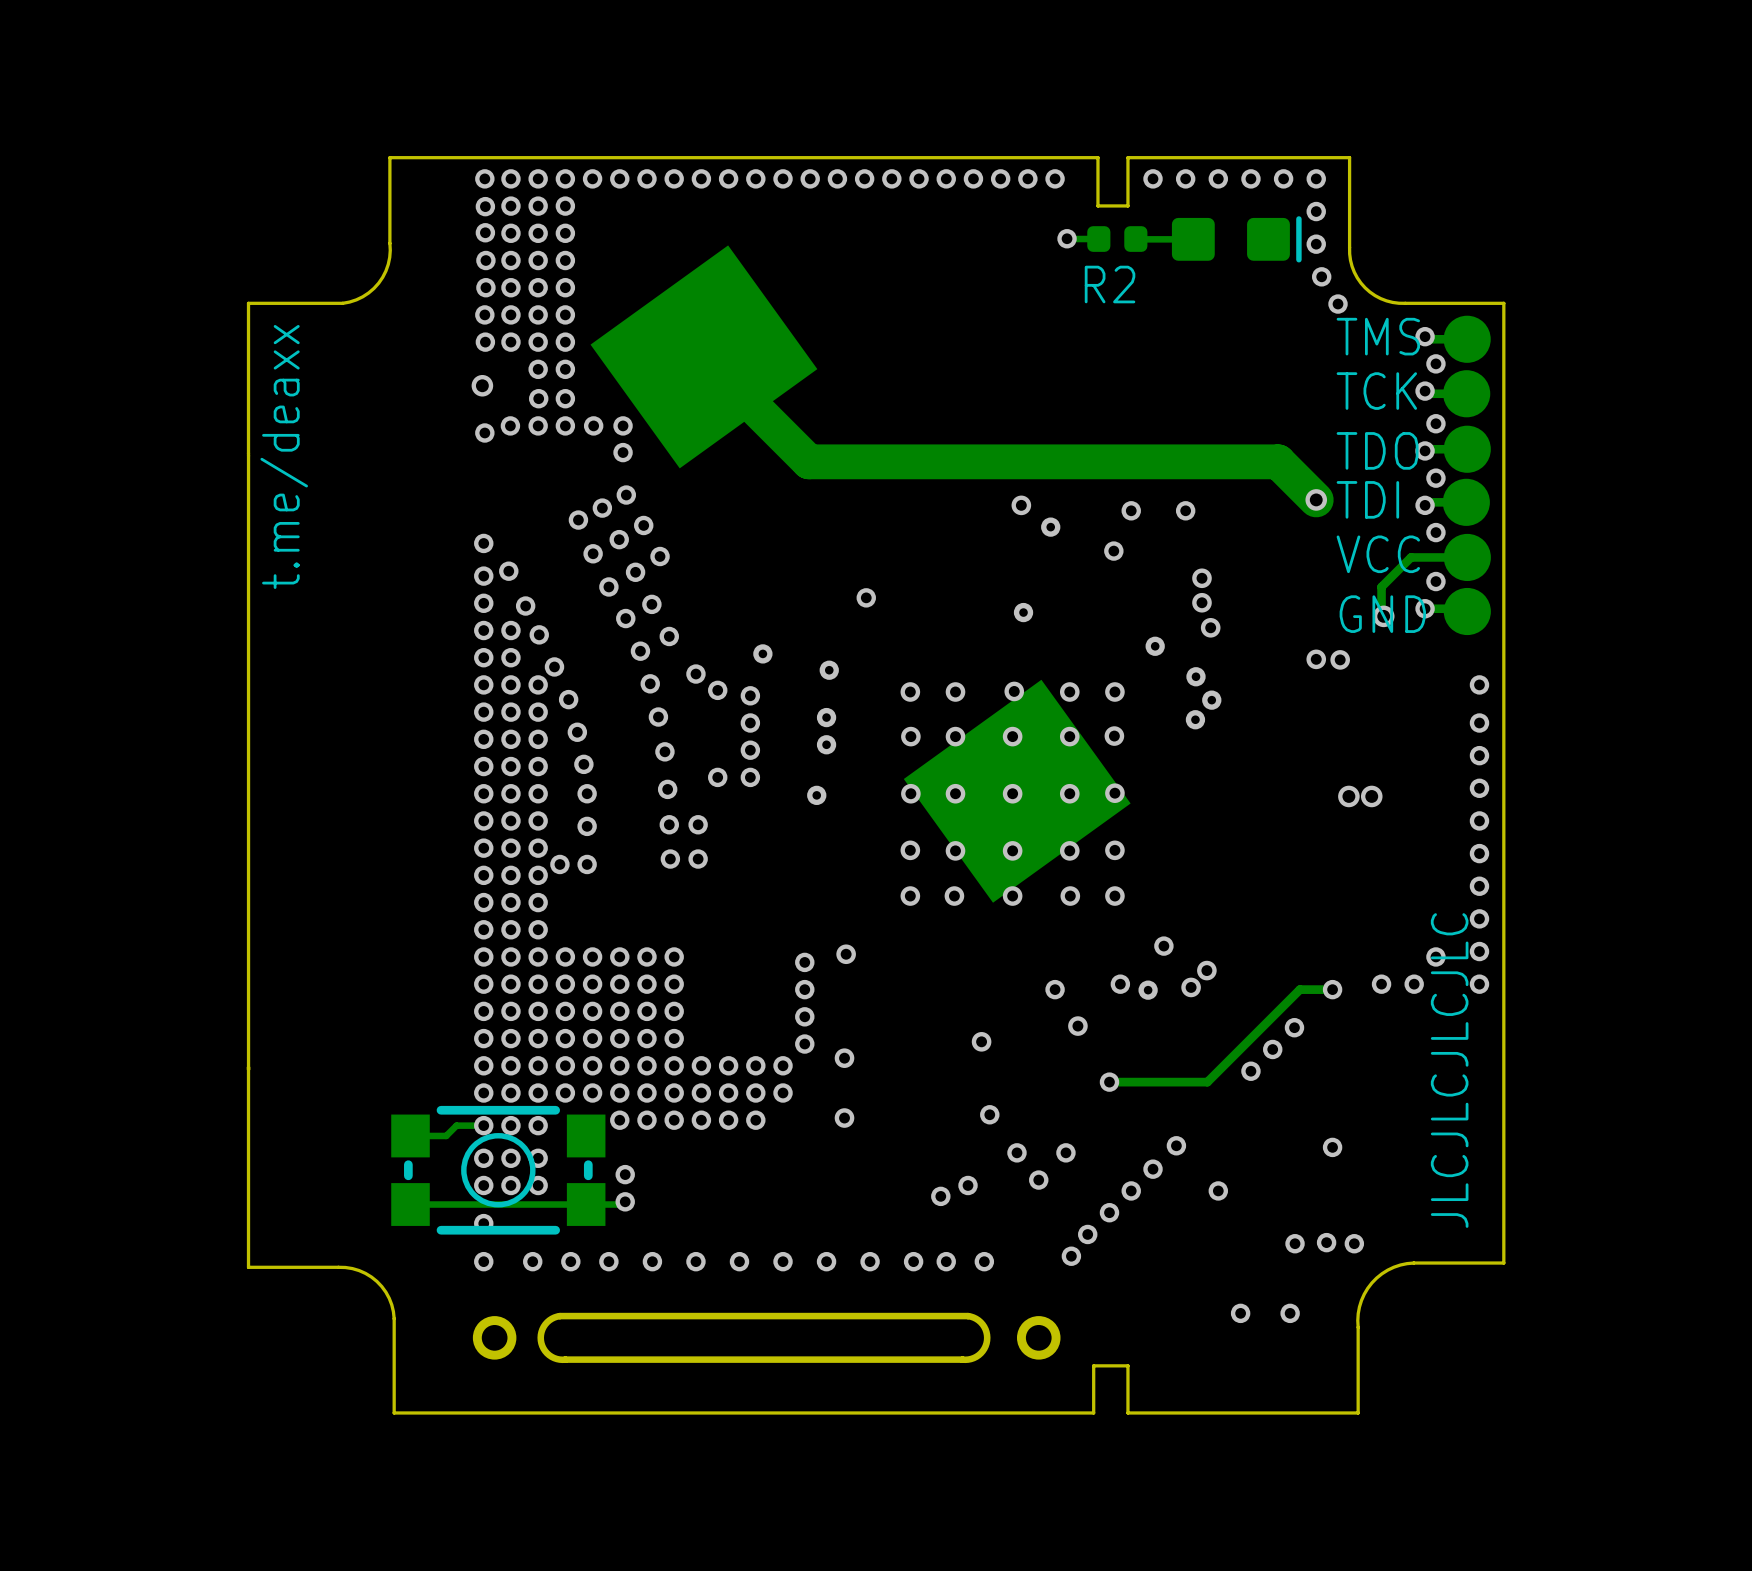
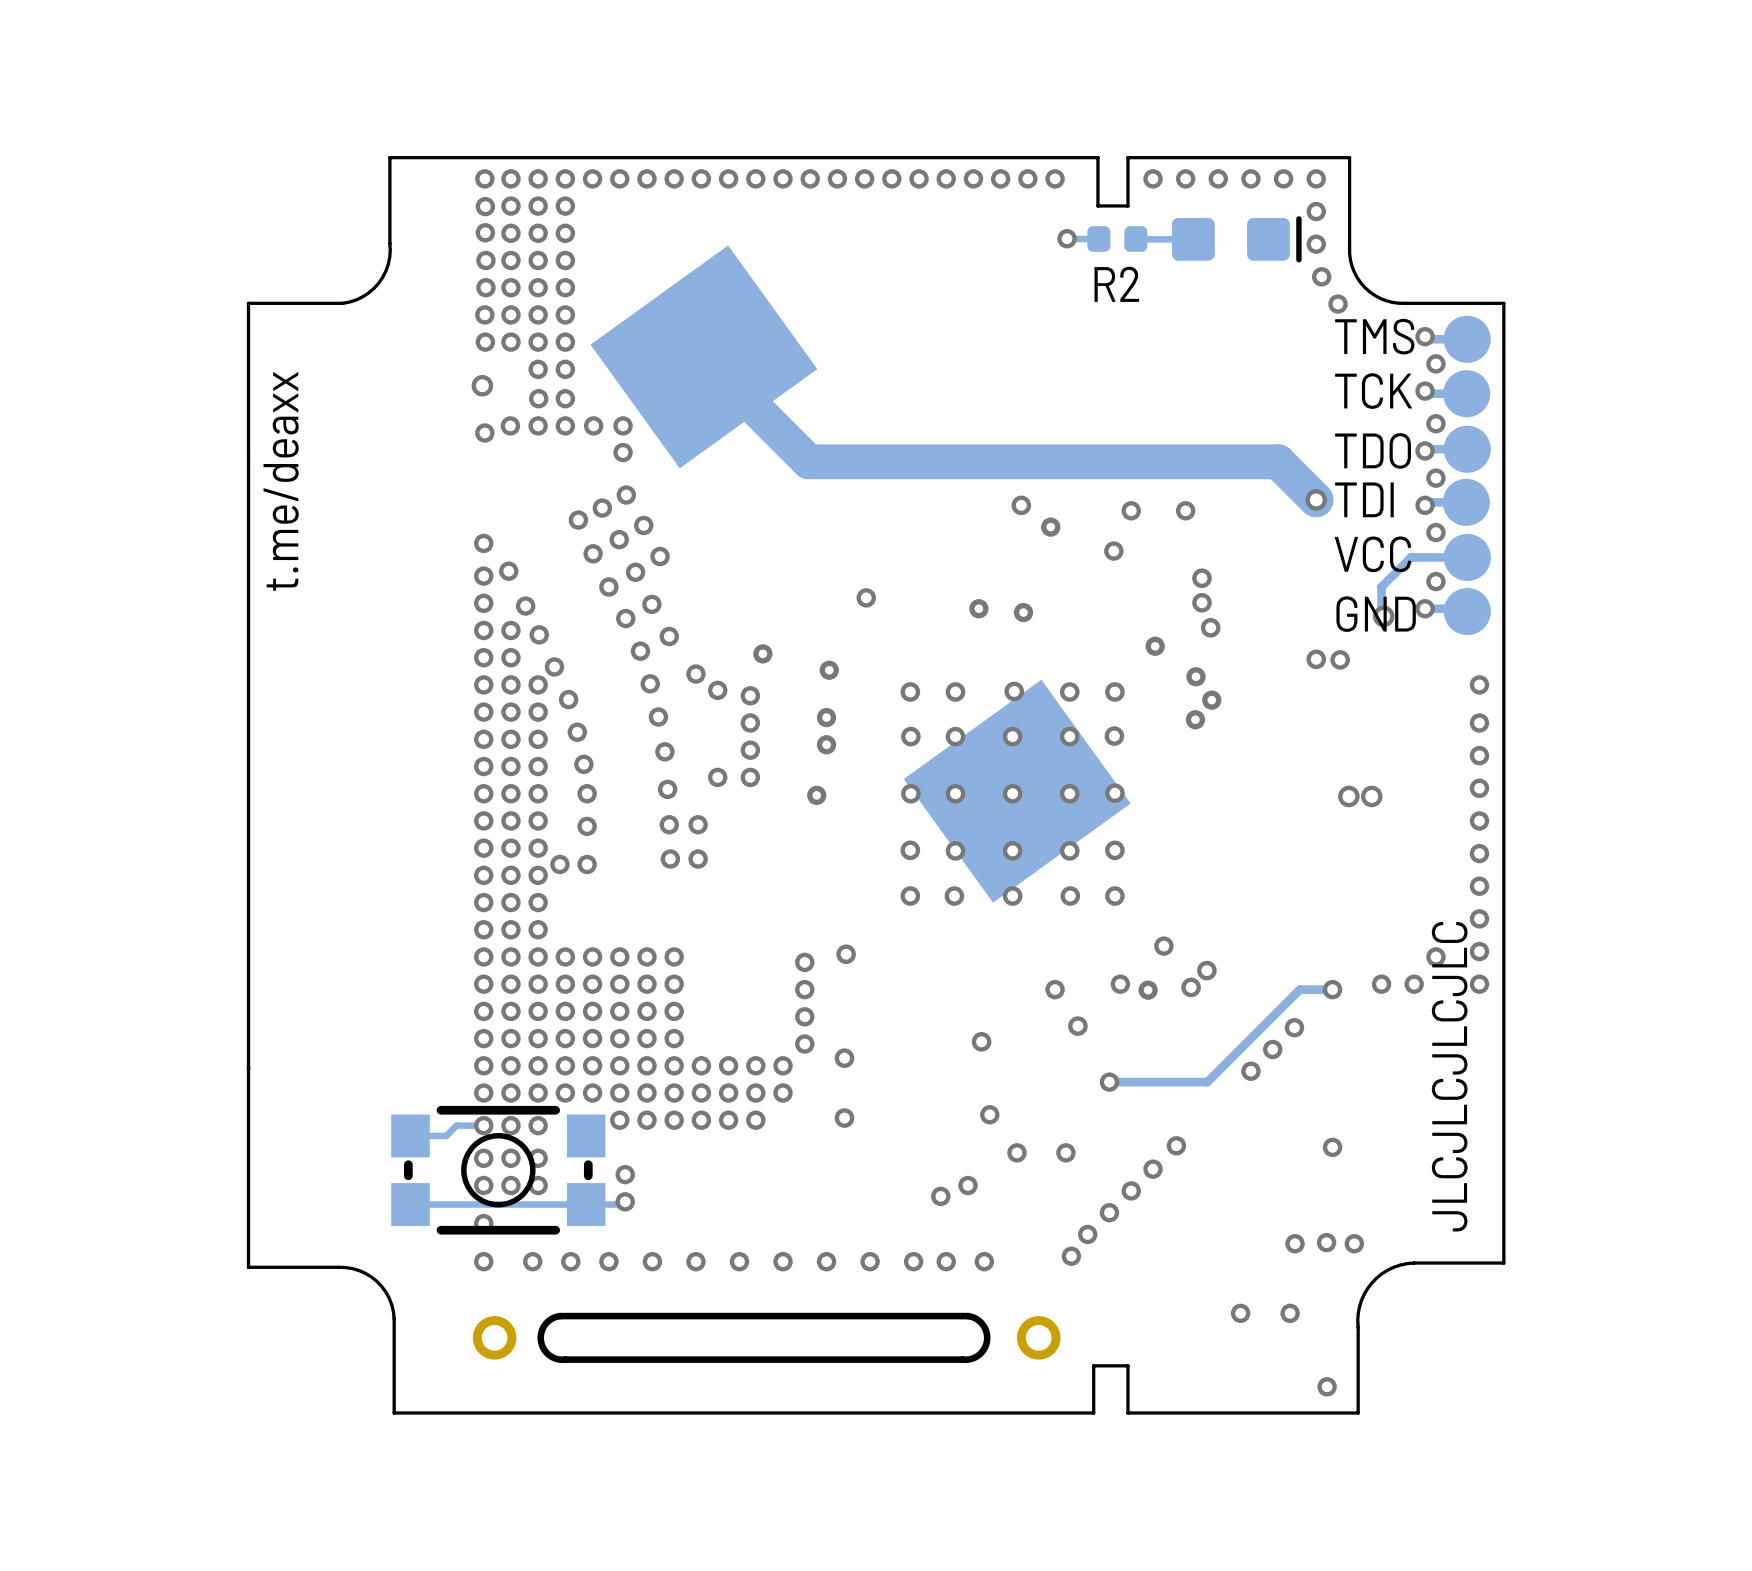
via: none -> (978, 608)
via: (1038, 1180) -> none
via: (1218, 1190) -> none
via: none -> (1327, 1386)

